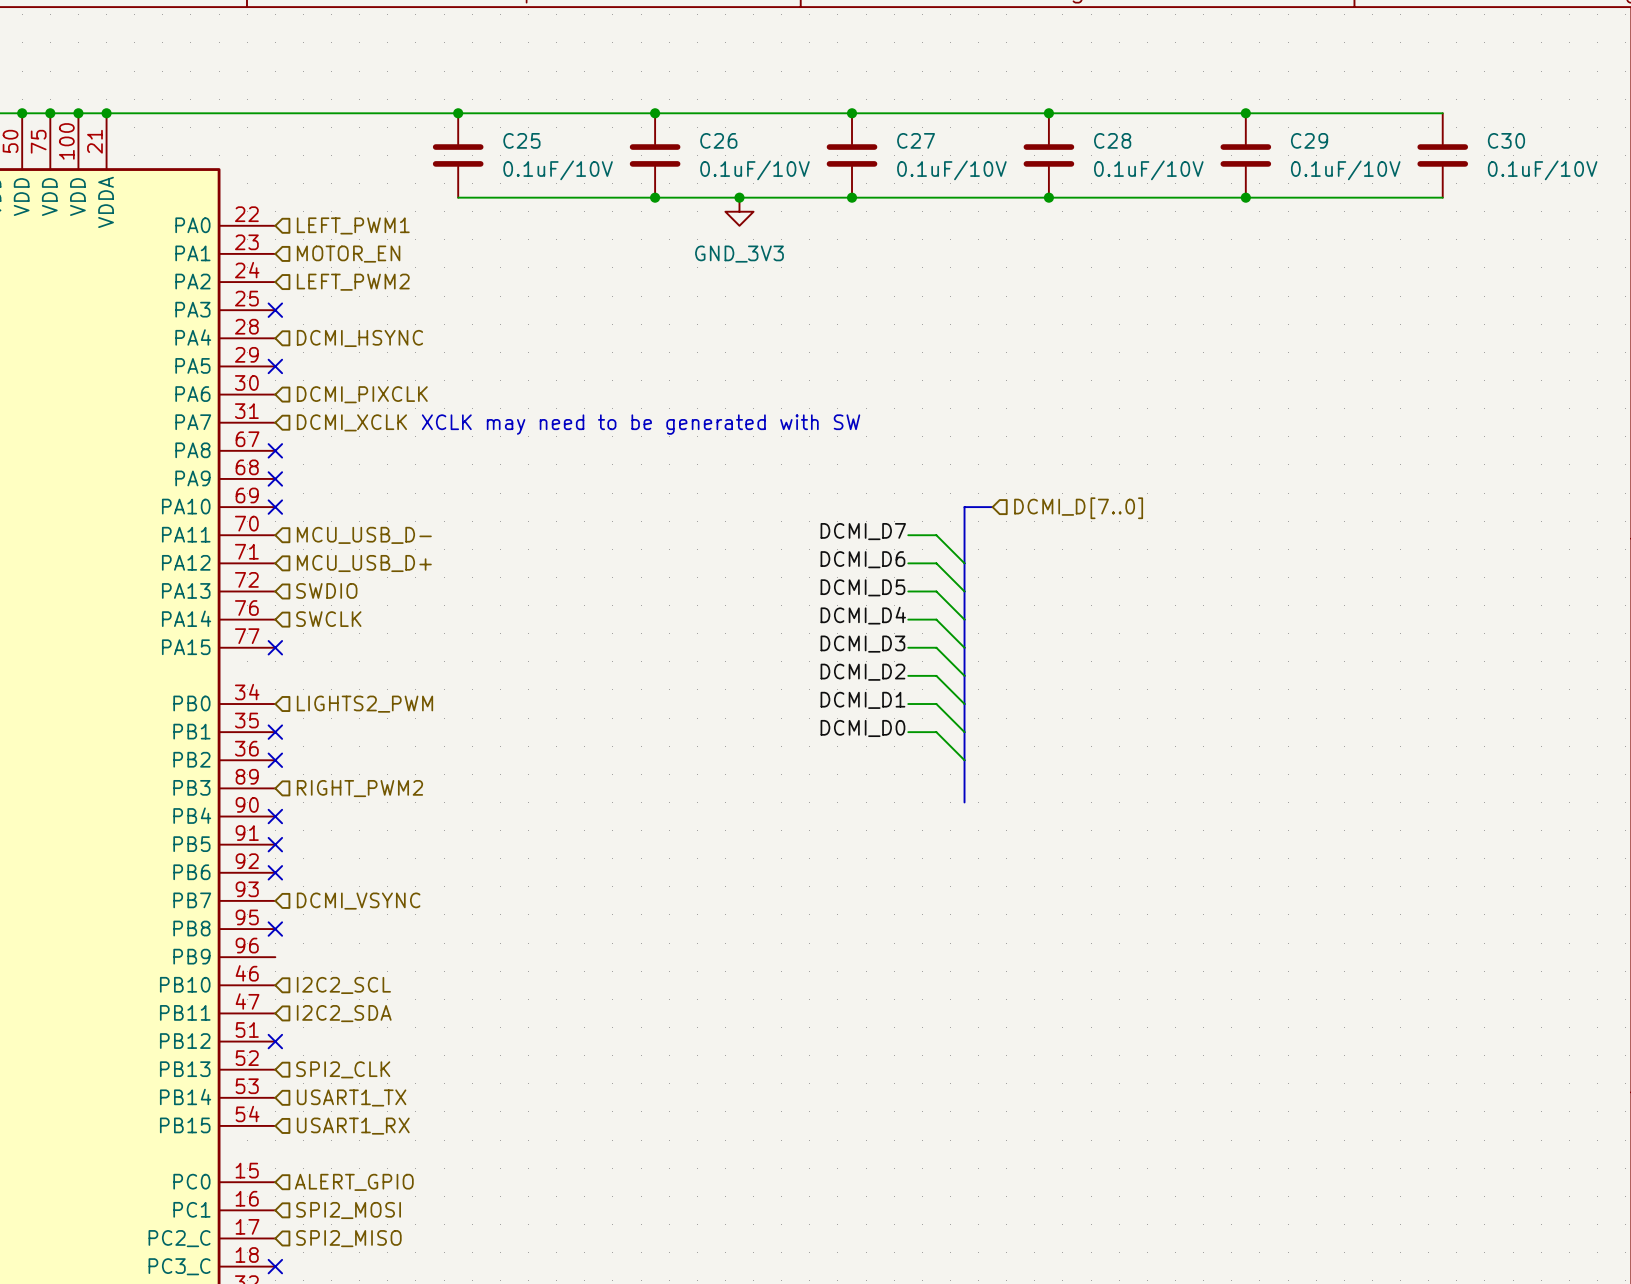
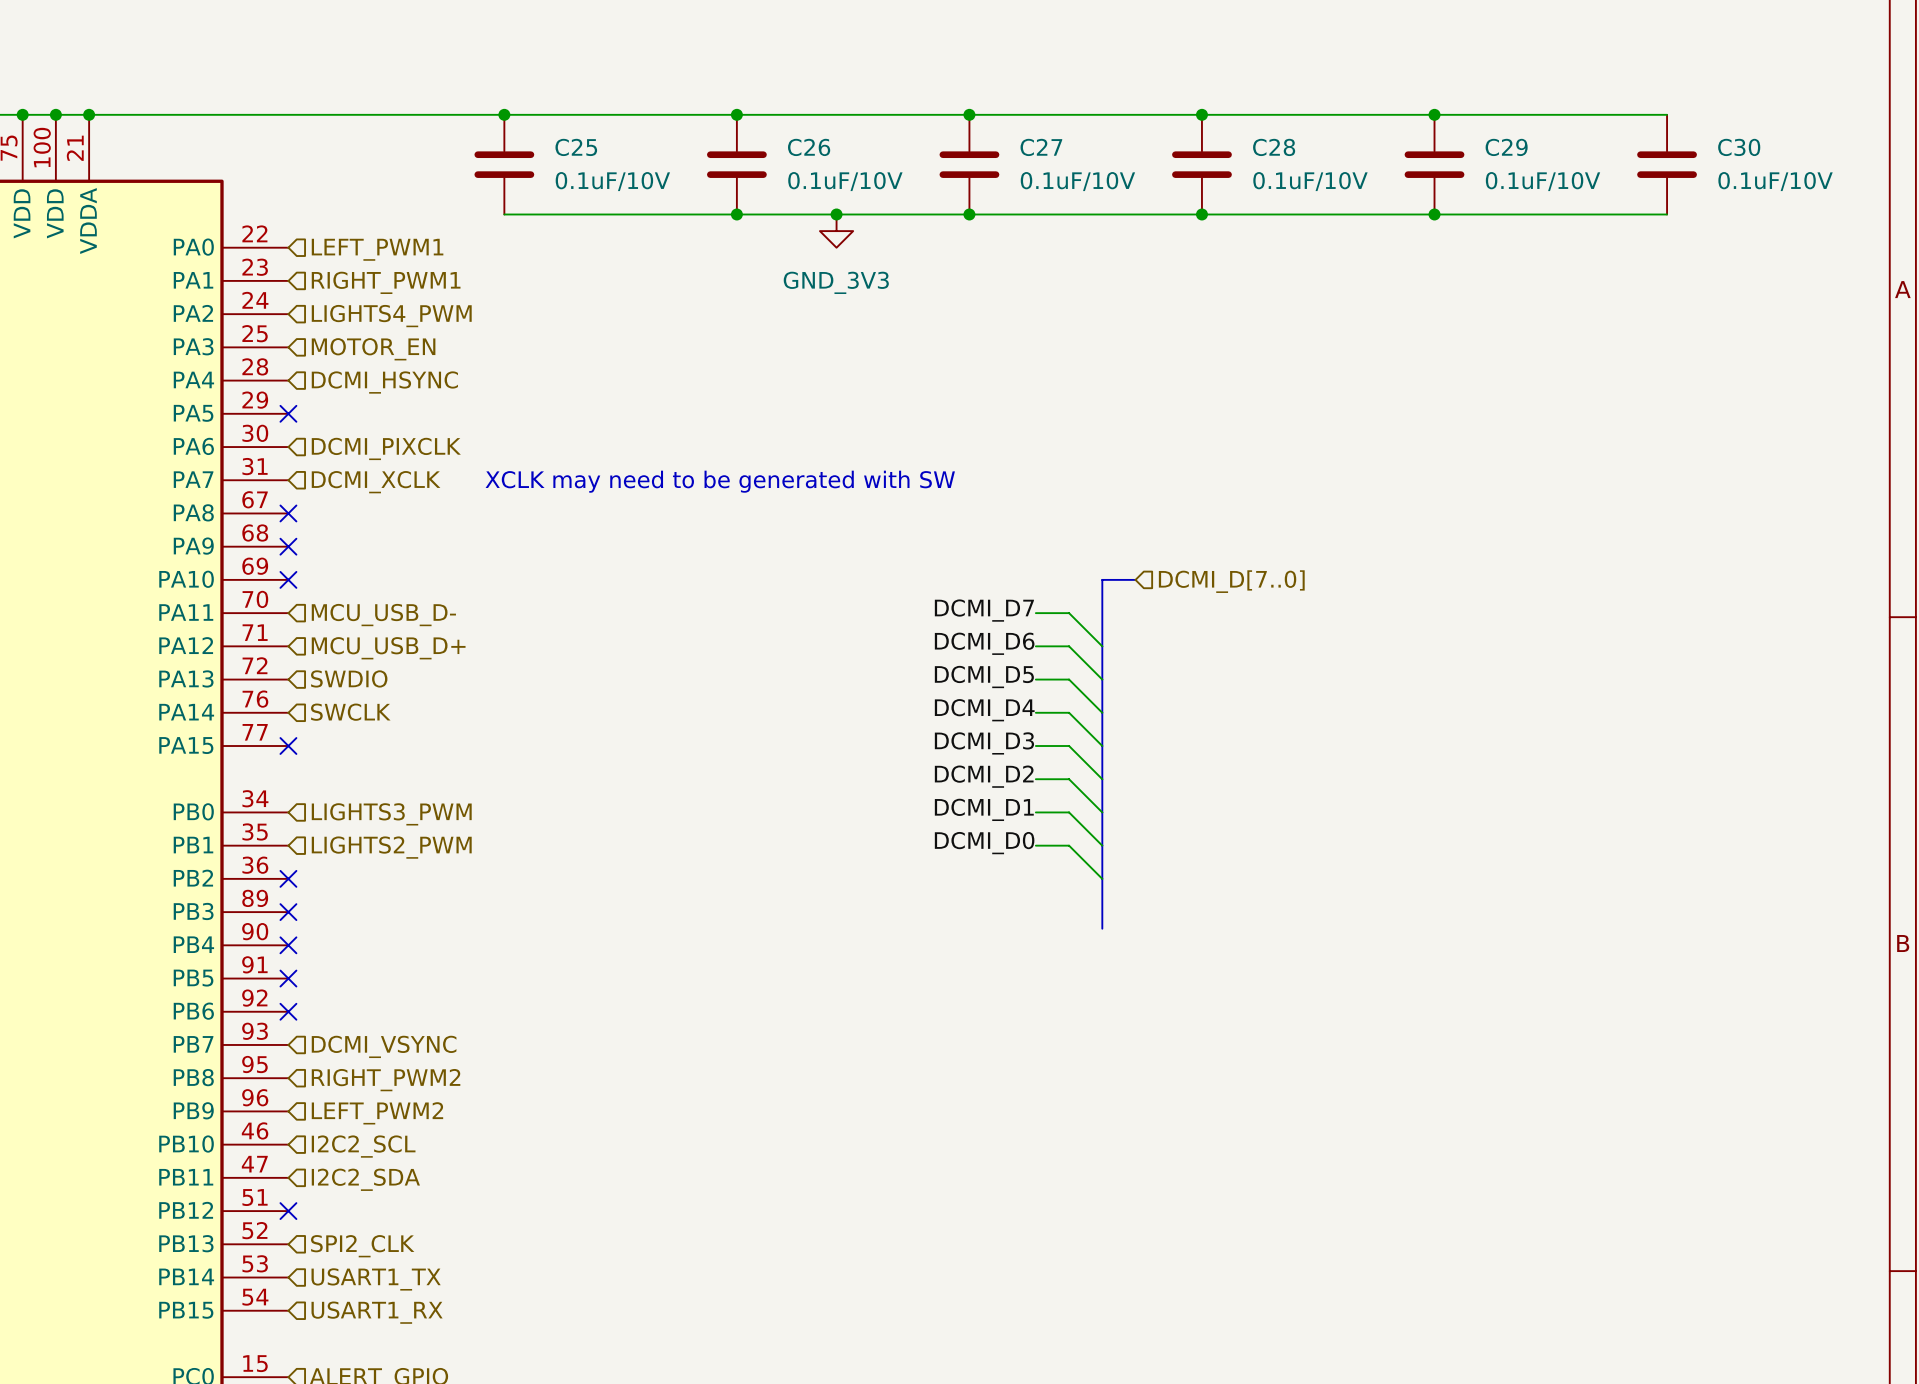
hierarchical label: MOTOR_EN (348, 254) -> RIGHT_PWM1 (386, 282)
hierarchical label: LEFT_PWM2 (353, 282) -> LIGHTS4_PWM (391, 316)
no-connect mark: (275, 310) -> none
hierarchical label: none -> MOTOR_EN (373, 349)
hierarchical label: LIGHTS2_PWM (364, 704) -> LIGHTS3_PWM (391, 814)
no-connect mark position: (275, 732) -> (288, 912)
hierarchical label: none -> LIGHTS2_PWM (391, 847)
hierarchical label position: RIGHT_PWM2 (359, 788) -> RIGHT_PWM2 (386, 1080)
no-connect mark: (275, 929) -> none
hierarchical label: none -> LEFT_PWM2 (377, 1113)

